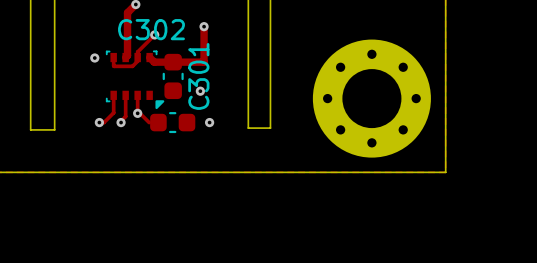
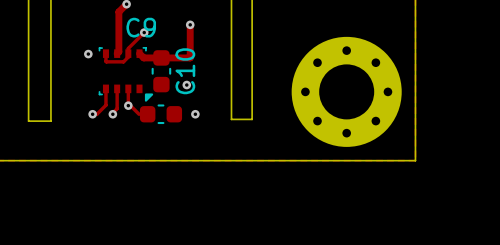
C302 name: C302 (151, 29) -> C9 (141, 27)
C301 name: C301 (198, 76) -> C10 (185, 71)

